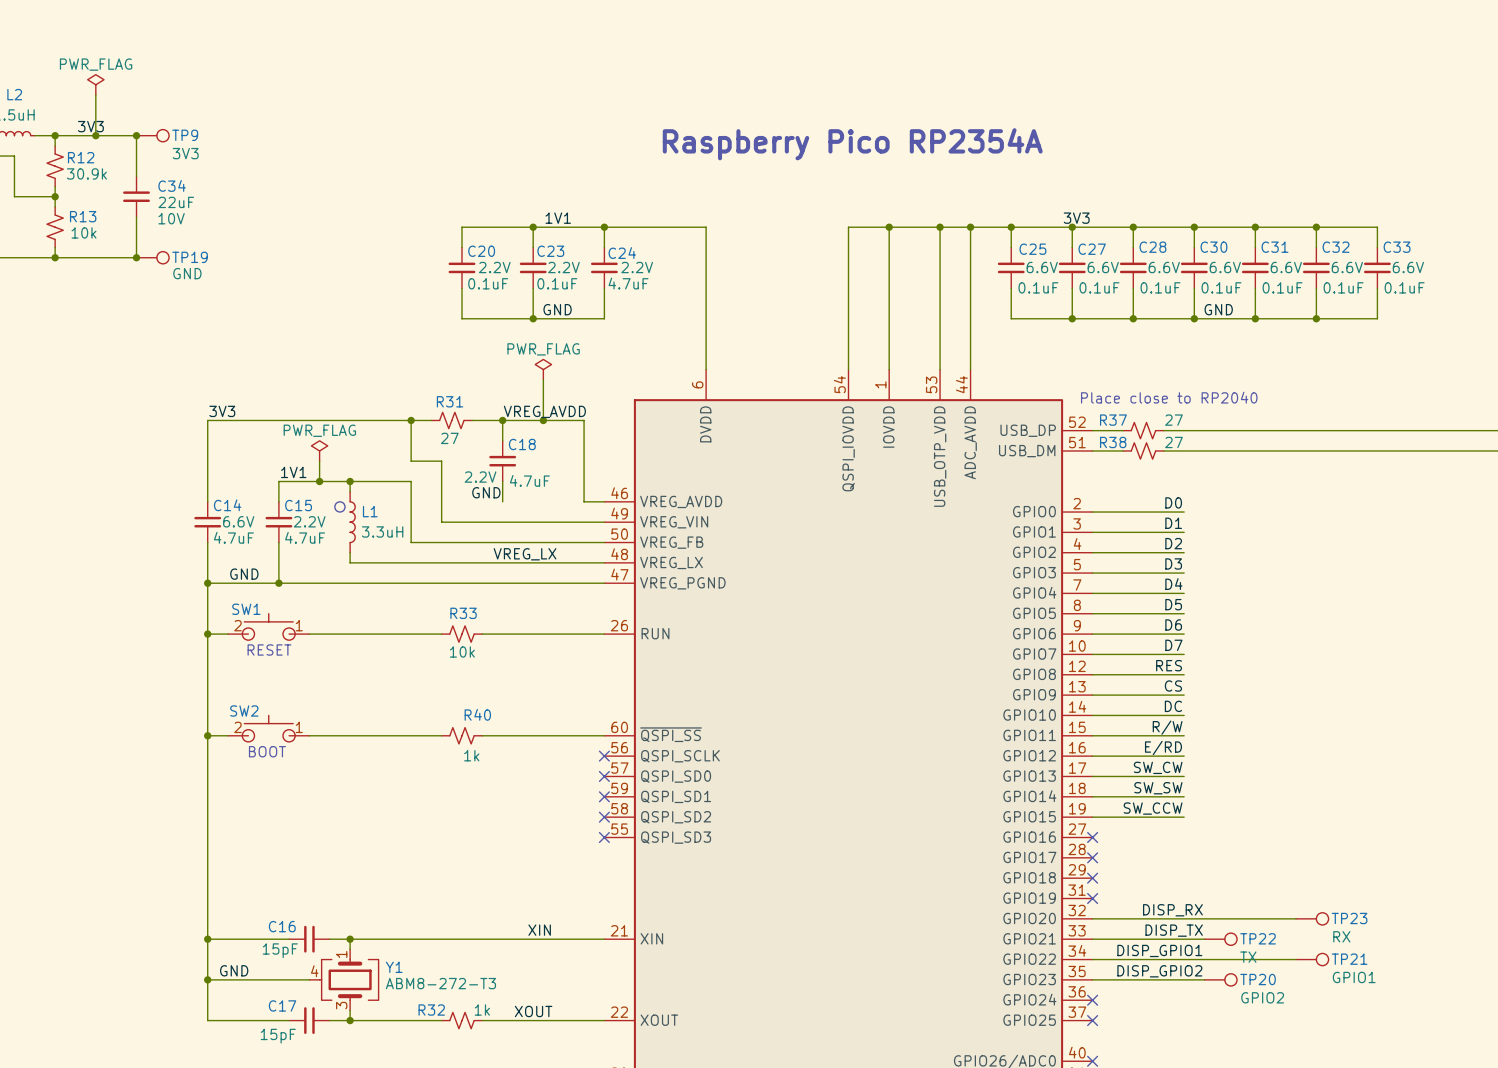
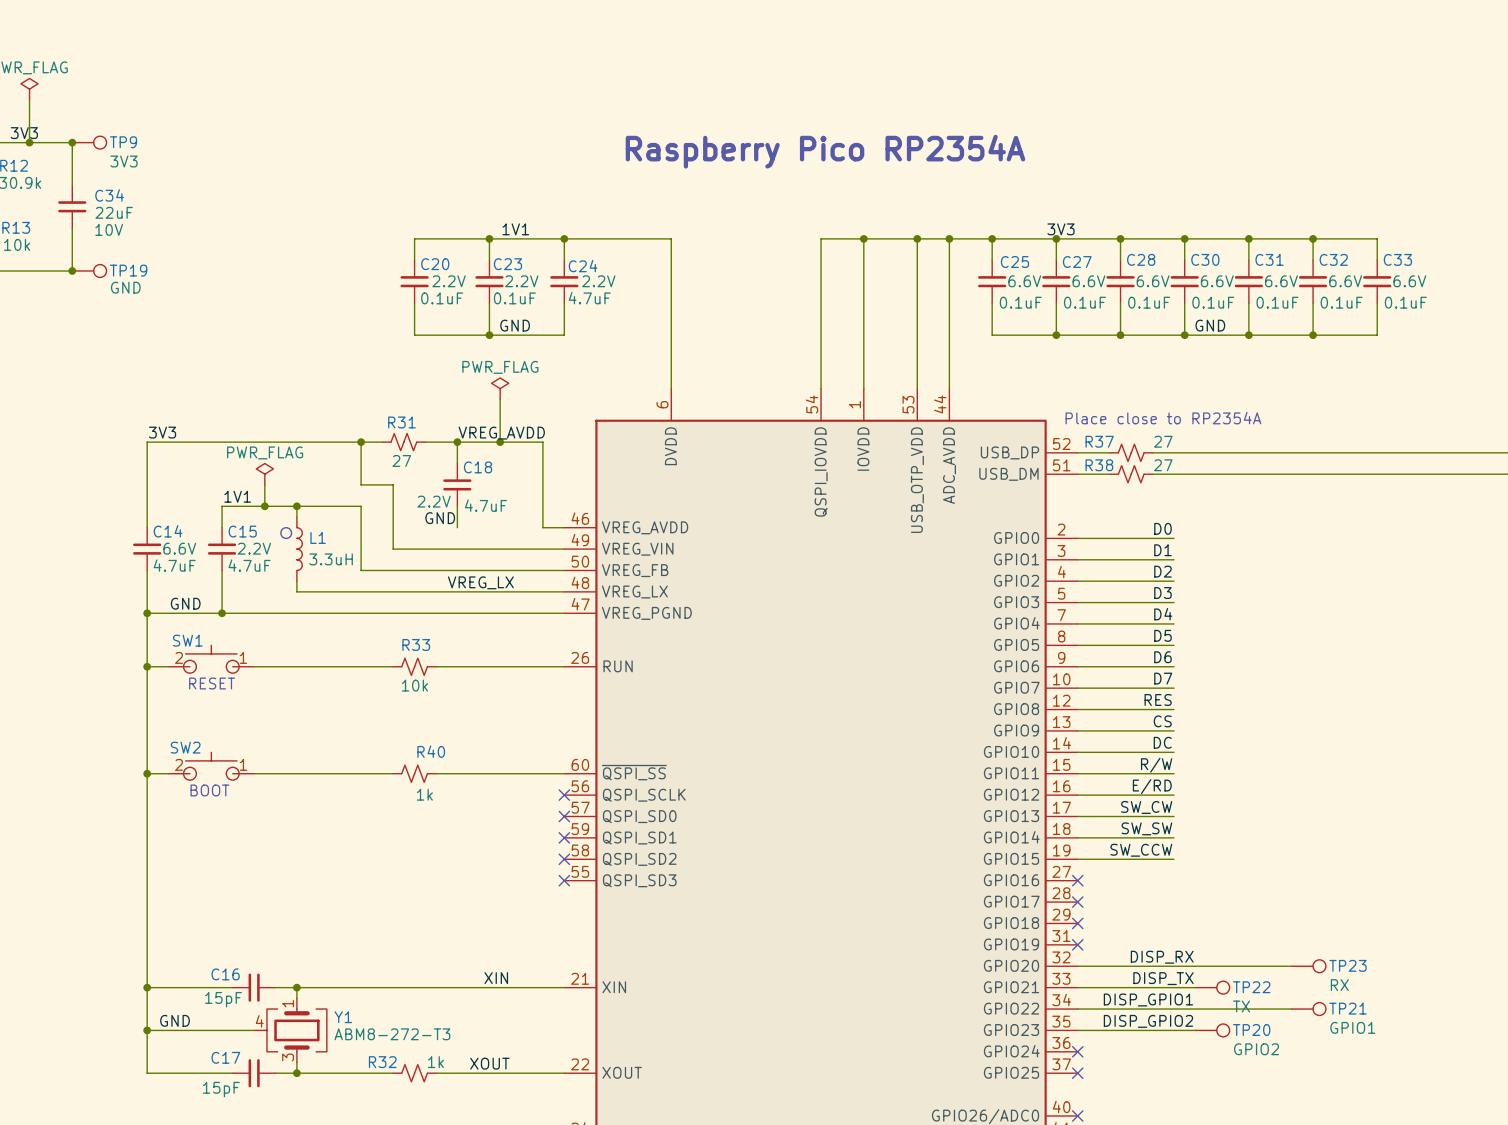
text: Place close to RP2040 (1169, 397) -> Place close to RP2354A (1163, 418)

